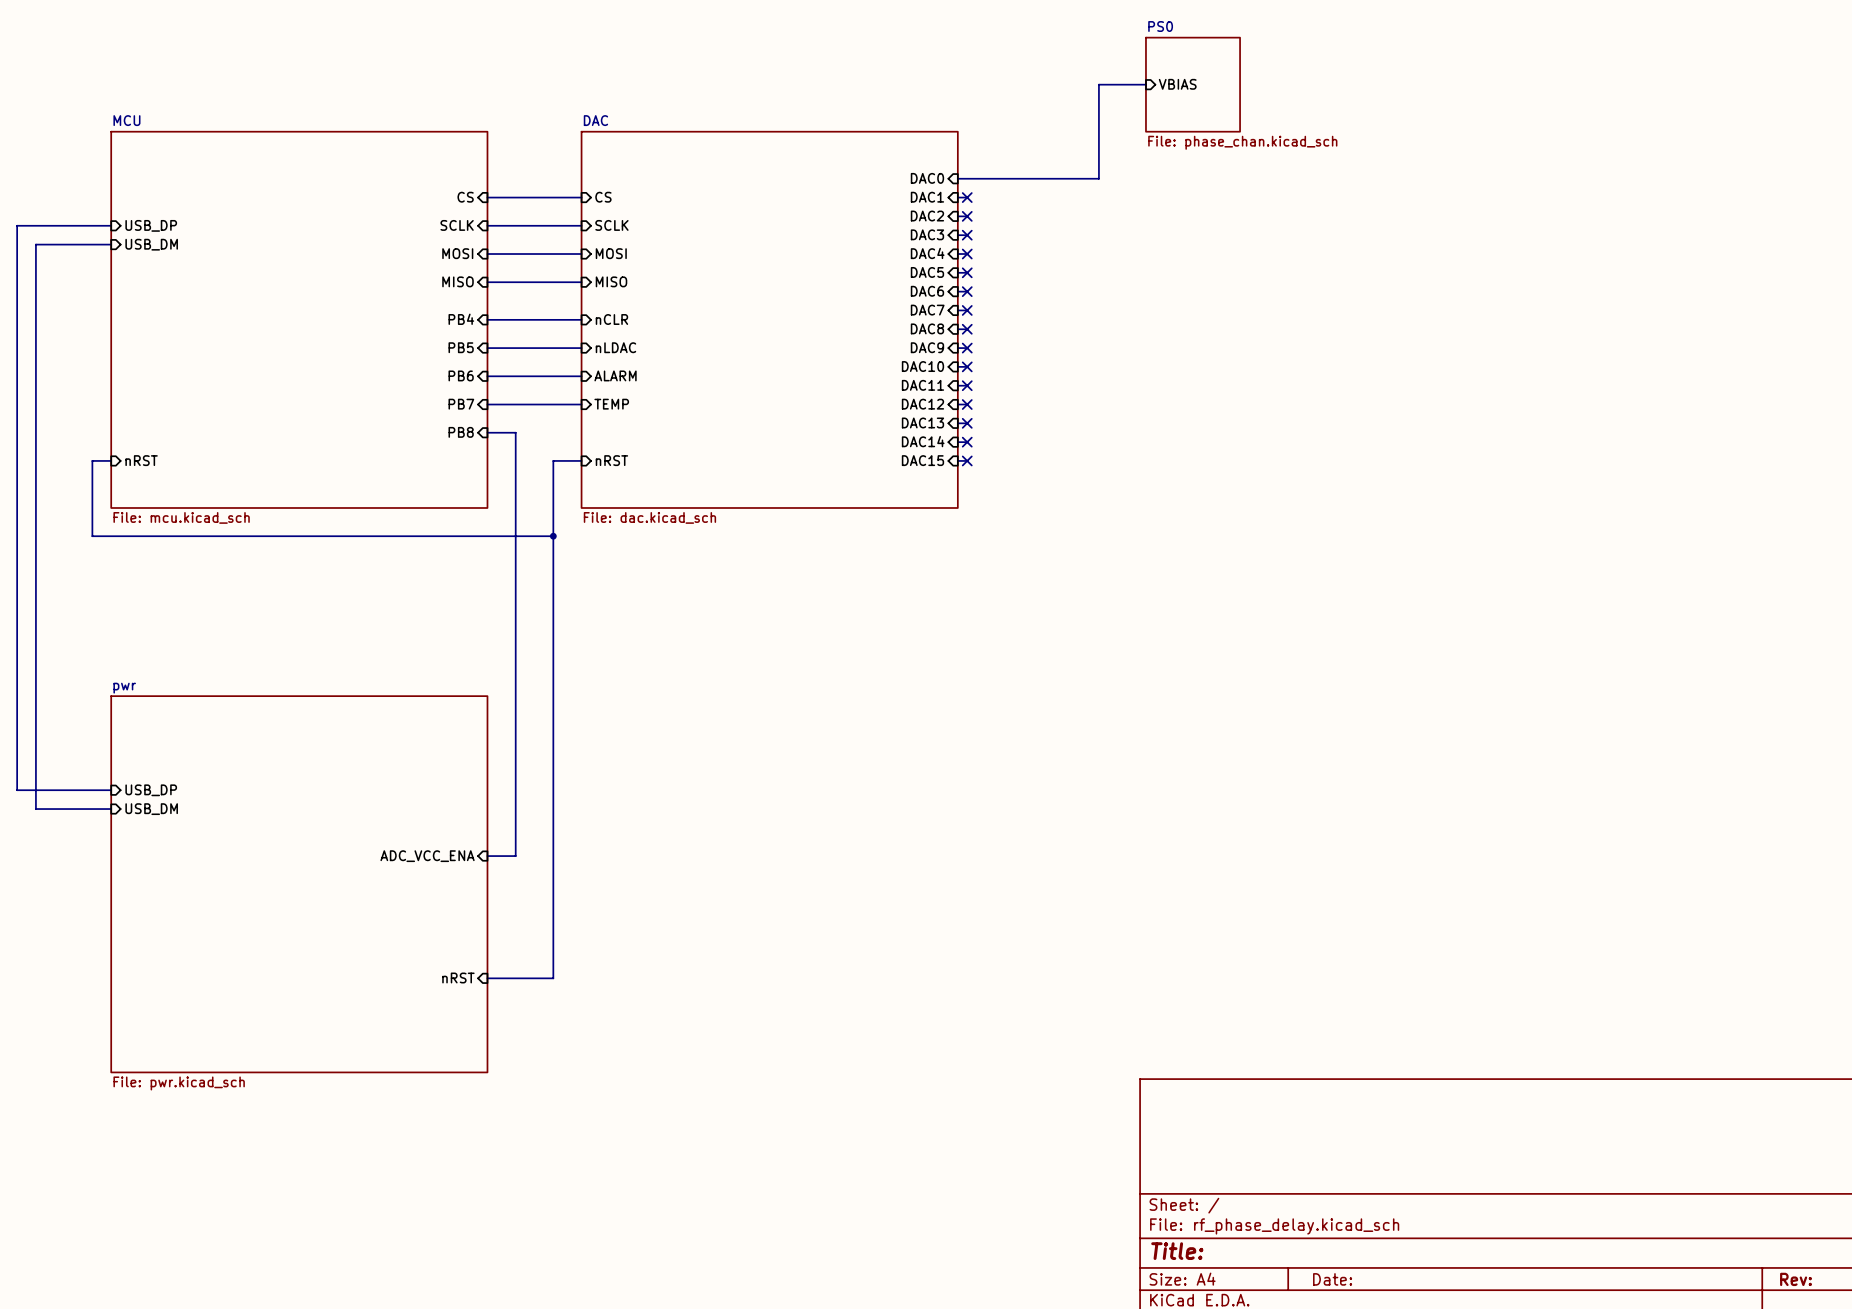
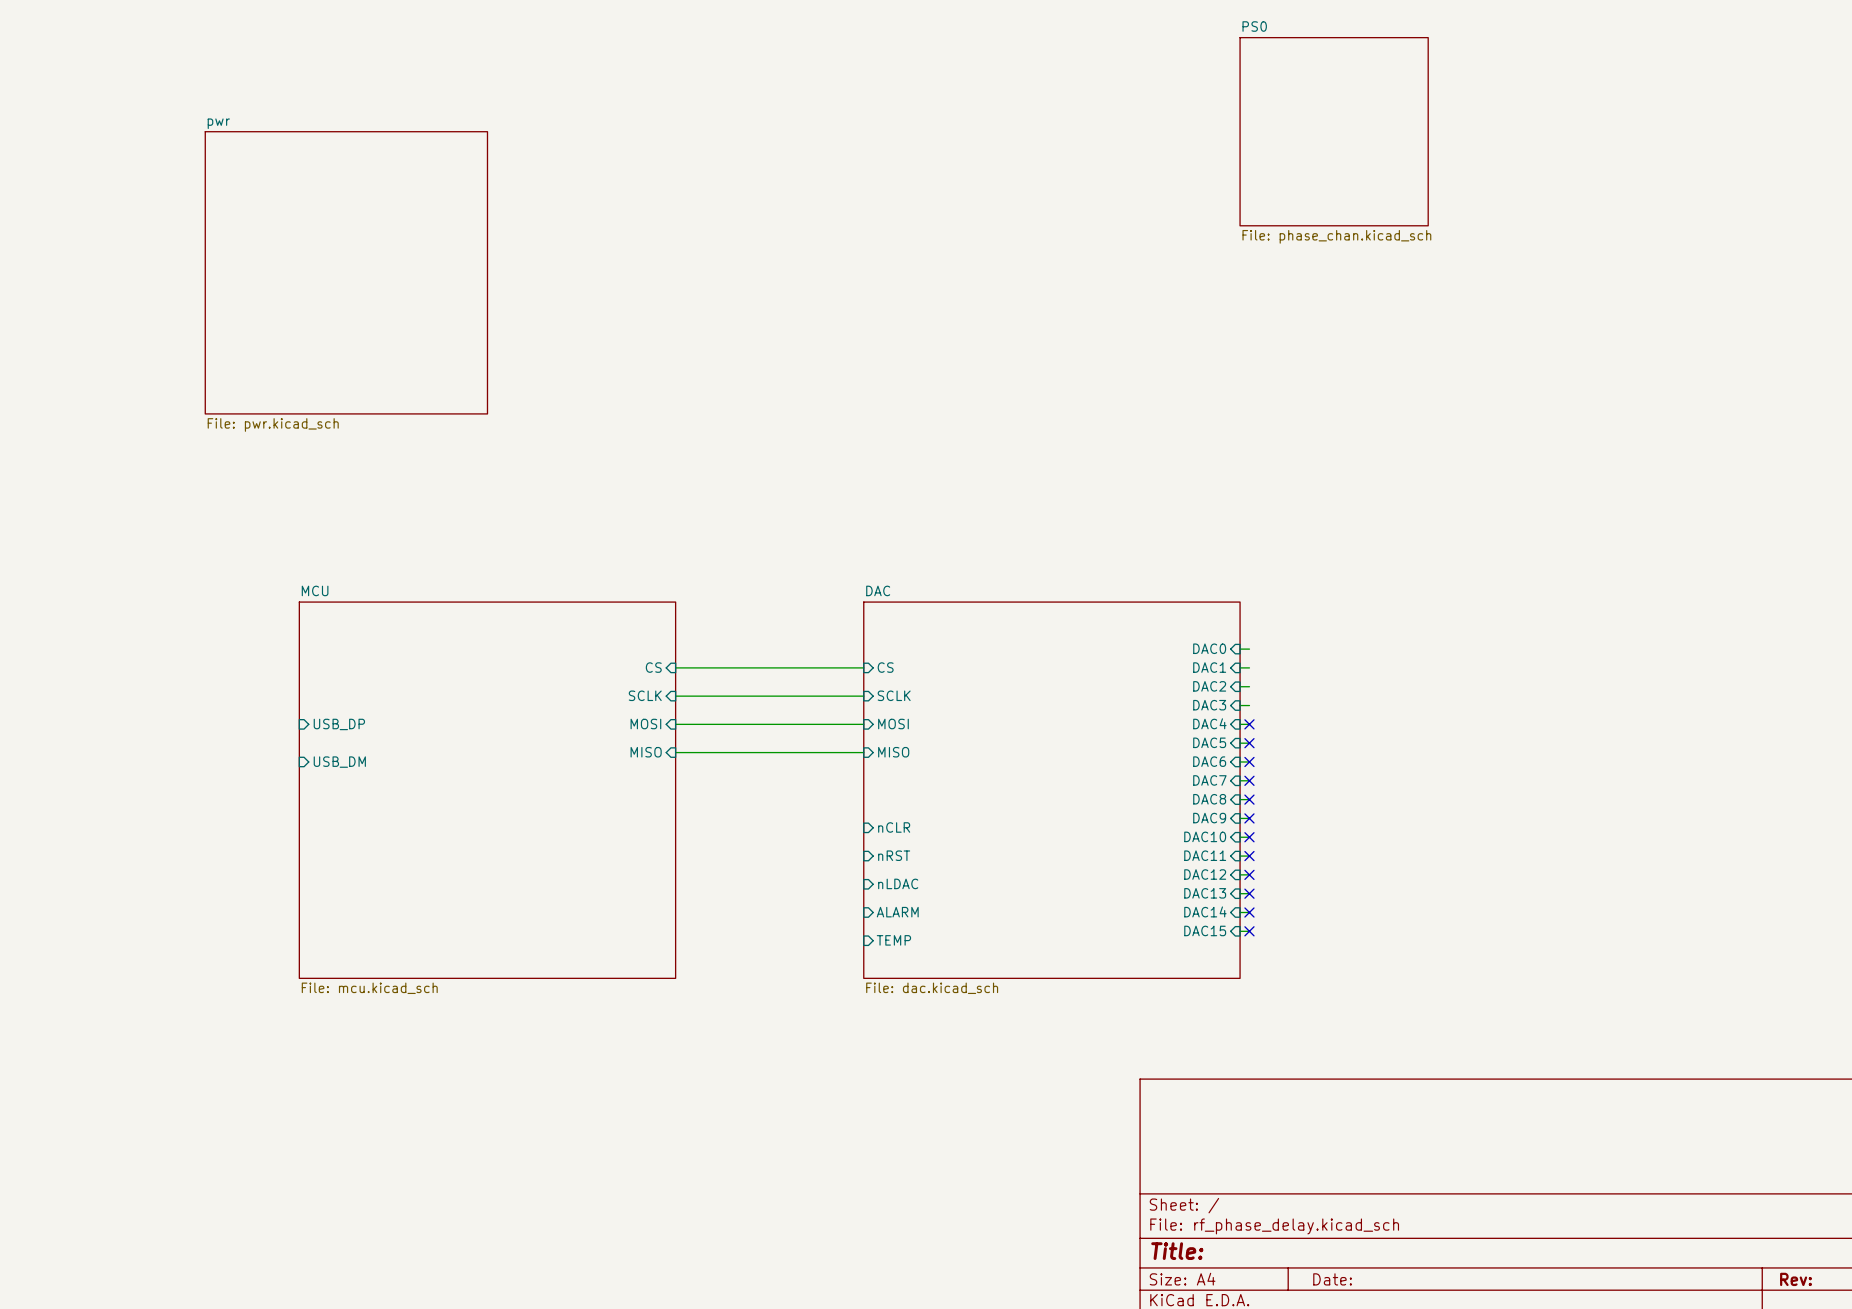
sheet PS0 name position: PS0 (1160, 26) -> PS0 (1254, 26)
sheet PS0 shape: [1145, 37, 1241, 133] -> [1239, 37, 1429, 227]
wire: (1145, 84) (1098, 84) (1098, 178) (957, 178) -> none
sheet pin: VBIAS (1177, 84) -> none
sheet PS0 value position: File: phase_chan.kicad_sch (1242, 142) -> File: phase_chan.kicad_sch (1336, 236)
sheet pin: DAC0 (927, 178) -> none
sheet pin: CS (465, 197) -> none
wire: (487, 197) (581, 197) -> none
sheet pin: CS (603, 197) -> none
sheet pin: DAC1 (927, 197) -> none
wire: (957, 197) (967, 197) -> none
no-connect mark: (967, 197) -> none
sheet pin: DAC2 (927, 216) -> none
wire: (957, 216) (967, 216) -> none
no-connect mark: (967, 216) -> none
wire: (111, 225) (17, 225) (17, 790) (111, 790) -> none
sheet pin: USB_DP (151, 225) -> none
sheet pin: SCLK (457, 225) -> none
wire: (487, 225) (581, 225) -> none
sheet pin: SCLK (611, 225) -> none
sheet pin: DAC3 (927, 234) -> none
wire: (957, 235) (967, 235) -> none
no-connect mark: (967, 235) -> none
wire: (111, 244) (35, 244) (35, 809) (111, 809) -> none
sheet pin: USB_DM (151, 244) -> none
sheet pin: MOSI (457, 253) -> none
sheet pin: MOSI (611, 253) -> none
sheet pin: DAC4 (927, 253) -> none
wire: (487, 254) (581, 254) -> none
wire: (957, 254) (967, 254) -> none
no-connect mark: (967, 254) -> none
sheet pwr: none -> File: pwr.kicad_sch (346, 272)
sheet pin: DAC5 (927, 272) -> none
wire: (957, 272) (967, 272) -> none
no-connect mark: (967, 272) -> none
sheet pin: MISO (457, 281) -> none
sheet pin: MISO (611, 281) -> none
wire: (487, 282) (581, 282) -> none
sheet pin: DAC6 (927, 291) -> none
wire: (957, 291) (967, 291) -> none
no-connect mark: (967, 291) -> none
sheet pin: DAC7 (927, 310) -> none
wire: (957, 310) (967, 310) -> none
no-connect mark: (967, 310) -> none
sheet MCU: File: mcu.kicad_sch (299, 319) -> none
sheet pin: PB4 (461, 319) -> none
wire: (487, 319) (581, 319) -> none
sheet pin: nCLR (611, 319) -> none
sheet DAC: File: dac.kicad_sch (769, 319) -> none
sheet pin: DAC8 (927, 328) -> none
wire: (957, 329) (967, 329) -> none
no-connect mark: (967, 329) -> none
sheet pin: PB5 (461, 347) -> none
sheet pin: nLDAC (615, 347) -> none
sheet pin: DAC9 (927, 347) -> none
wire: (487, 348) (581, 348) -> none
wire: (957, 348) (967, 348) -> none
no-connect mark: (967, 348) -> none
sheet pin: DAC10 (922, 366) -> none
wire: (957, 366) (967, 366) -> none
no-connect mark: (967, 366) -> none
sheet pin: PB6 (461, 375) -> none
sheet pin: ALARM (615, 375) -> none
wire: (487, 376) (581, 376) -> none
sheet pin: DAC11 (922, 385) -> none
wire: (957, 385) (967, 385) -> none
no-connect mark: (967, 385) -> none
sheet pin: PB7 (461, 404) -> none
wire: (487, 404) (581, 404) -> none
sheet pin: TEMP (611, 404) -> none
sheet pin: DAC12 (922, 404) -> none
wire: (957, 404) (967, 404) -> none
no-connect mark: (967, 404) -> none
sheet pin: DAC13 (922, 422) -> none
wire: (957, 423) (967, 423) -> none
no-connect mark: (967, 423) -> none
sheet pin: PB8 (461, 432) -> none
wire: (487, 432) (515, 432) (515, 856) (487, 856) -> none
sheet pin: DAC14 (923, 441) -> none
wire: (957, 442) (967, 442) -> none
no-connect mark: (967, 442) -> none
wire: (111, 460) (92, 460) (92, 536) (553, 536) -> none
sheet pin: nRST (141, 460) -> none
wire: (581, 460) (553, 460) (553, 978) (487, 978) -> none
sheet pin: nRST (611, 460) -> none
sheet pin: DAC15 (922, 460) -> none
wire: (957, 460) (967, 460) -> none
no-connect mark: (967, 460) -> none
junction: (553, 536) -> none
sheet pin: none -> DAC0 (1209, 648)
wire: none -> (1240, 649) (1249, 649)
sheet pin: none -> CS (653, 667)
wire: none -> (675, 667) (863, 667)
sheet pin: none -> CS (885, 667)
sheet pin: none -> DAC1 (1209, 667)
wire: none -> (1240, 667) (1249, 667)
sheet pin: none -> DAC2 (1209, 686)
wire: none -> (1240, 686) (1249, 686)
sheet pin: none -> SCLK (645, 695)
sheet pin: none -> SCLK (894, 695)
wire: none -> (675, 696) (863, 696)
sheet pin: none -> DAC3 (1209, 705)
wire: none -> (1240, 705) (1249, 705)
sheet pin: none -> DAC4 (1209, 723)
sheet pin: none -> USB_DP (339, 724)
sheet pin: none -> MOSI (645, 724)
wire: none -> (675, 724) (863, 724)
sheet pin: none -> MOSI (893, 724)
wire: none -> (1240, 724) (1249, 724)
no-connect mark: none -> (1249, 724)
sheet pin: none -> DAC5 (1209, 742)
wire: none -> (1240, 743) (1249, 743)
no-connect mark: none -> (1249, 743)
sheet pin: none -> MISO (646, 752)
wire: none -> (675, 752) (863, 752)
sheet pin: none -> MISO (893, 752)
sheet pin: none -> DAC6 (1209, 761)
wire: none -> (1240, 761) (1249, 761)
no-connect mark: none -> (1249, 761)
sheet pin: none -> USB_DM (339, 762)
sheet pin: none -> DAC7 (1209, 780)
wire: none -> (1240, 780) (1249, 780)
no-connect mark: none -> (1249, 780)
sheet pin: USB_DP (151, 790) -> none
sheet MCU: none -> File: mcu.kicad_sch (487, 790)
sheet DAC: none -> File: dac.kicad_sch (1051, 790)
sheet pin: none -> DAC8 (1209, 799)
wire: none -> (1240, 799) (1249, 799)
no-connect mark: none -> (1249, 799)
sheet pin: USB_DM (151, 809) -> none
sheet pin: none -> DAC9 (1209, 818)
wire: none -> (1240, 818) (1249, 818)
no-connect mark: none -> (1249, 818)
sheet pin: none -> nCLR (894, 827)
sheet pin: none -> DAC10 (1205, 836)
wire: none -> (1240, 837) (1249, 837)
no-connect mark: none -> (1249, 837)
sheet pin: none -> nRST (894, 855)
sheet pin: none -> DAC11 (1205, 855)
sheet pin: ADC_VCC_ENA (427, 856) -> none
wire: none -> (1240, 856) (1249, 856)
no-connect mark: none -> (1249, 856)
sheet pin: none -> DAC12 (1205, 874)
wire: none -> (1240, 874) (1249, 874)
no-connect mark: none -> (1249, 874)
sheet pin: none -> nLDAC (898, 883)
sheet pwr: File: pwr.kicad_sch (299, 884) -> none
sheet pin: none -> DAC13 (1205, 893)
wire: none -> (1240, 893) (1249, 893)
no-connect mark: none -> (1249, 893)
sheet pin: none -> DAC14 (1205, 911)
sheet pin: none -> ALARM (897, 912)
wire: none -> (1240, 912) (1249, 912)
no-connect mark: none -> (1249, 912)
sheet pin: none -> DAC15 (1205, 930)
wire: none -> (1240, 931) (1249, 931)
no-connect mark: none -> (1249, 931)
sheet pin: none -> TEMP (893, 940)
sheet pin: nRST (458, 977) -> none

